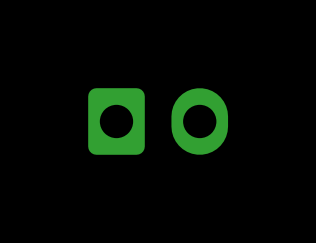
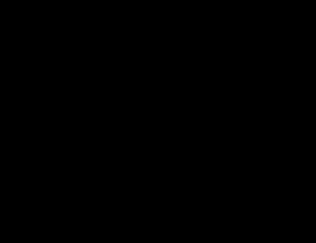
part: (158, 121) -> none

